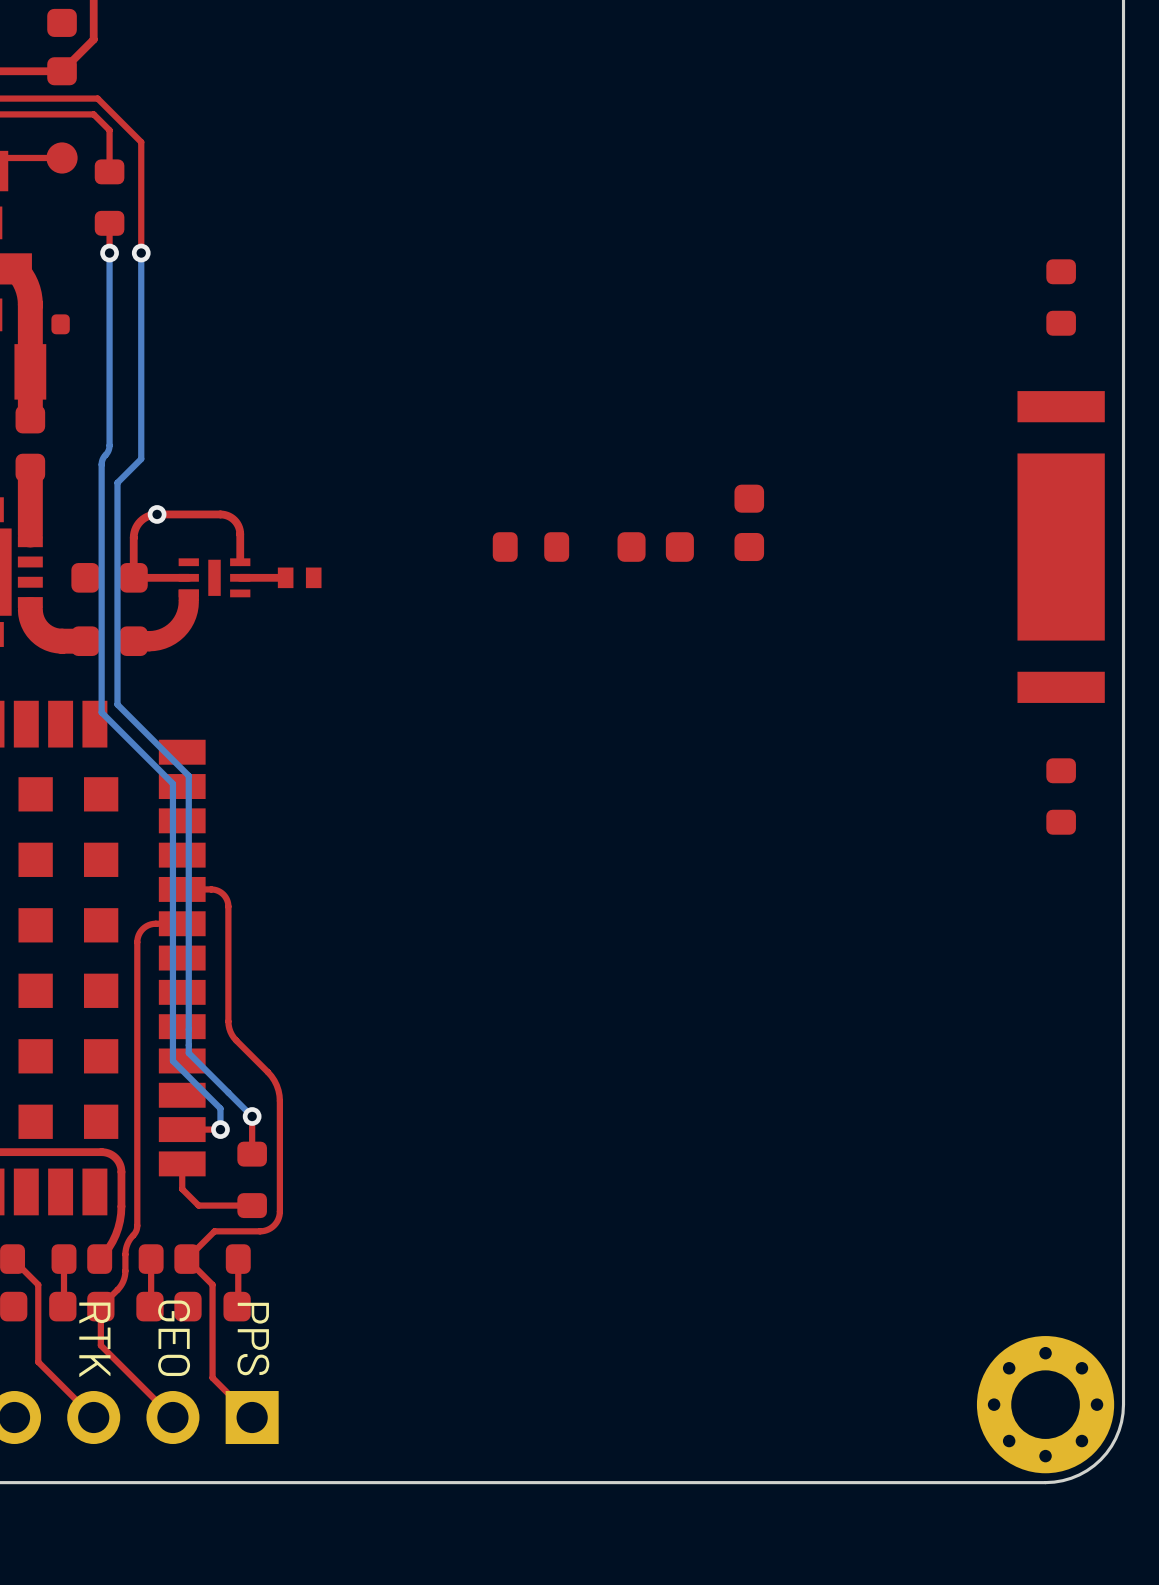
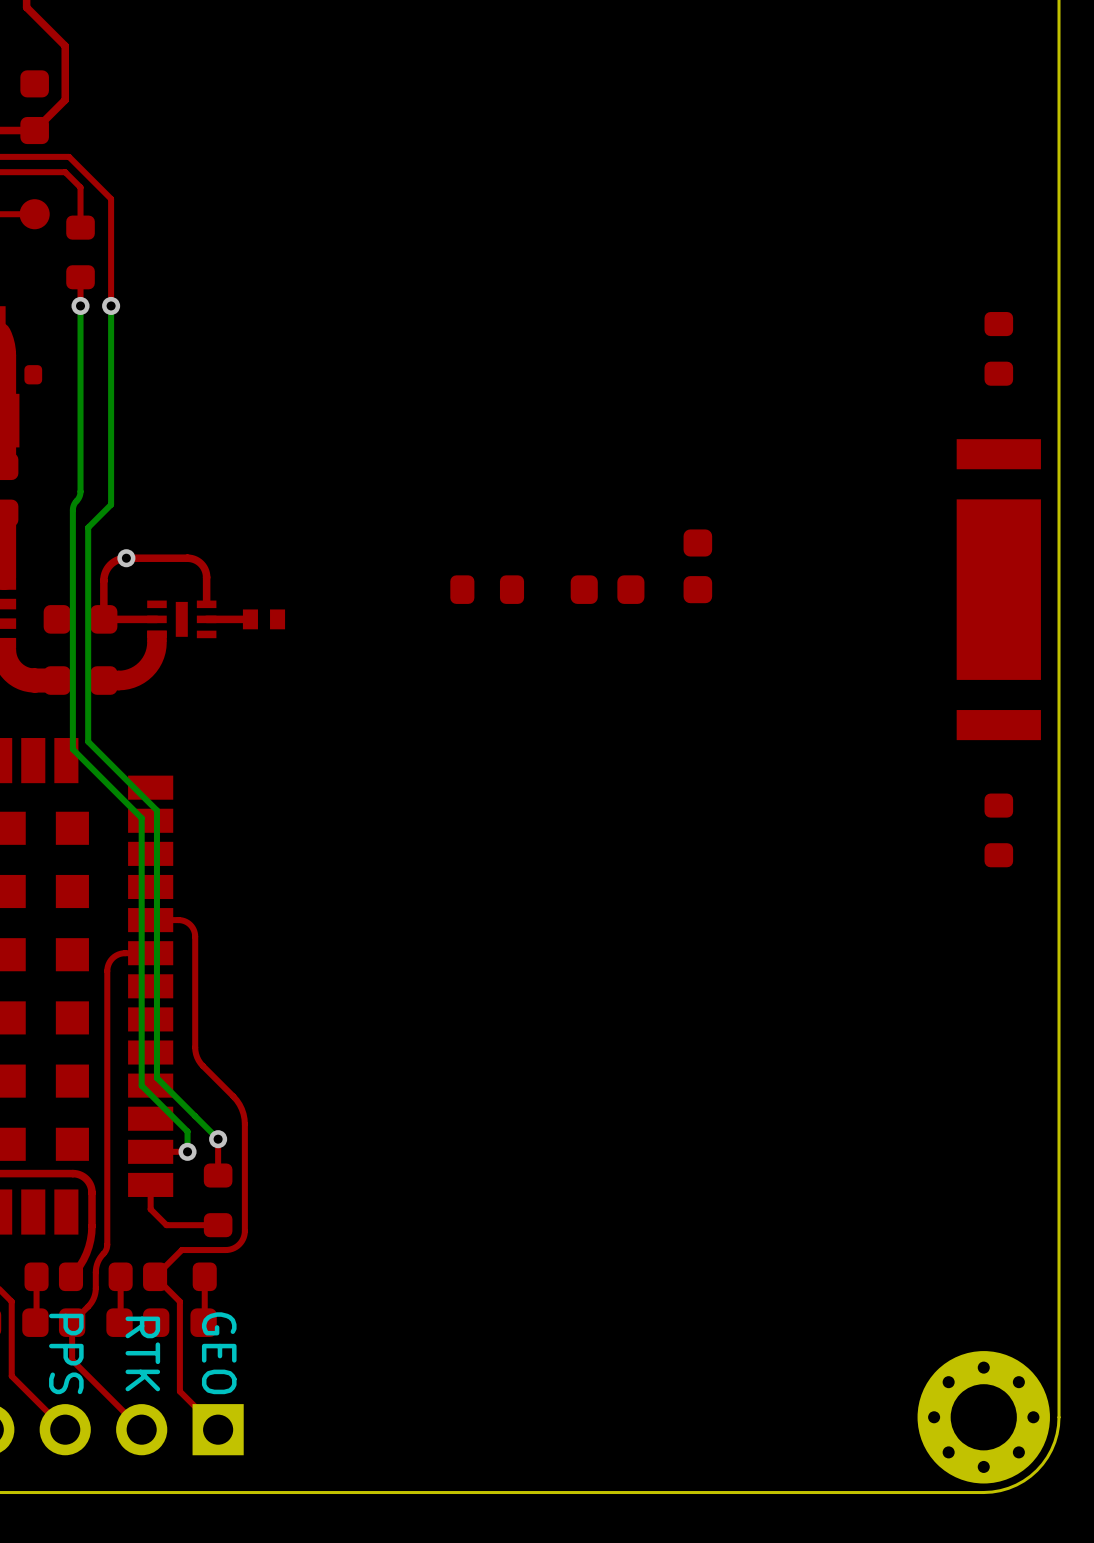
text: GEO (174, 1338) -> RTK (142, 1353)
text: RTK (94, 1339) -> PPS (66, 1353)
text: PPS (253, 1339) -> GEO (219, 1353)

